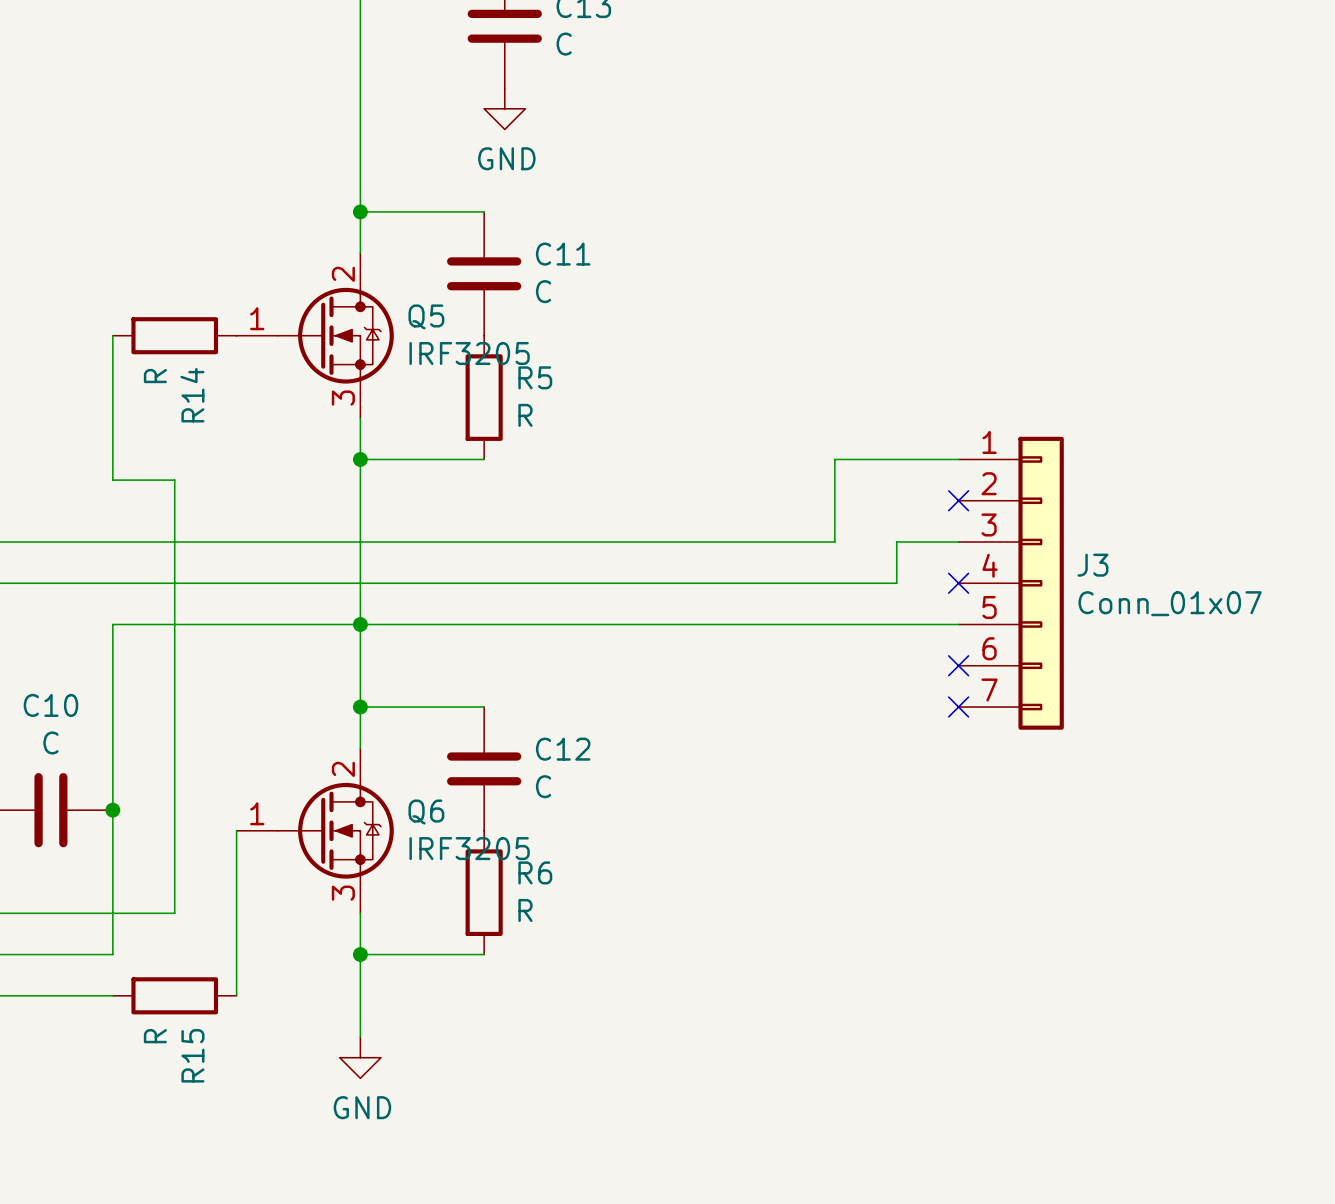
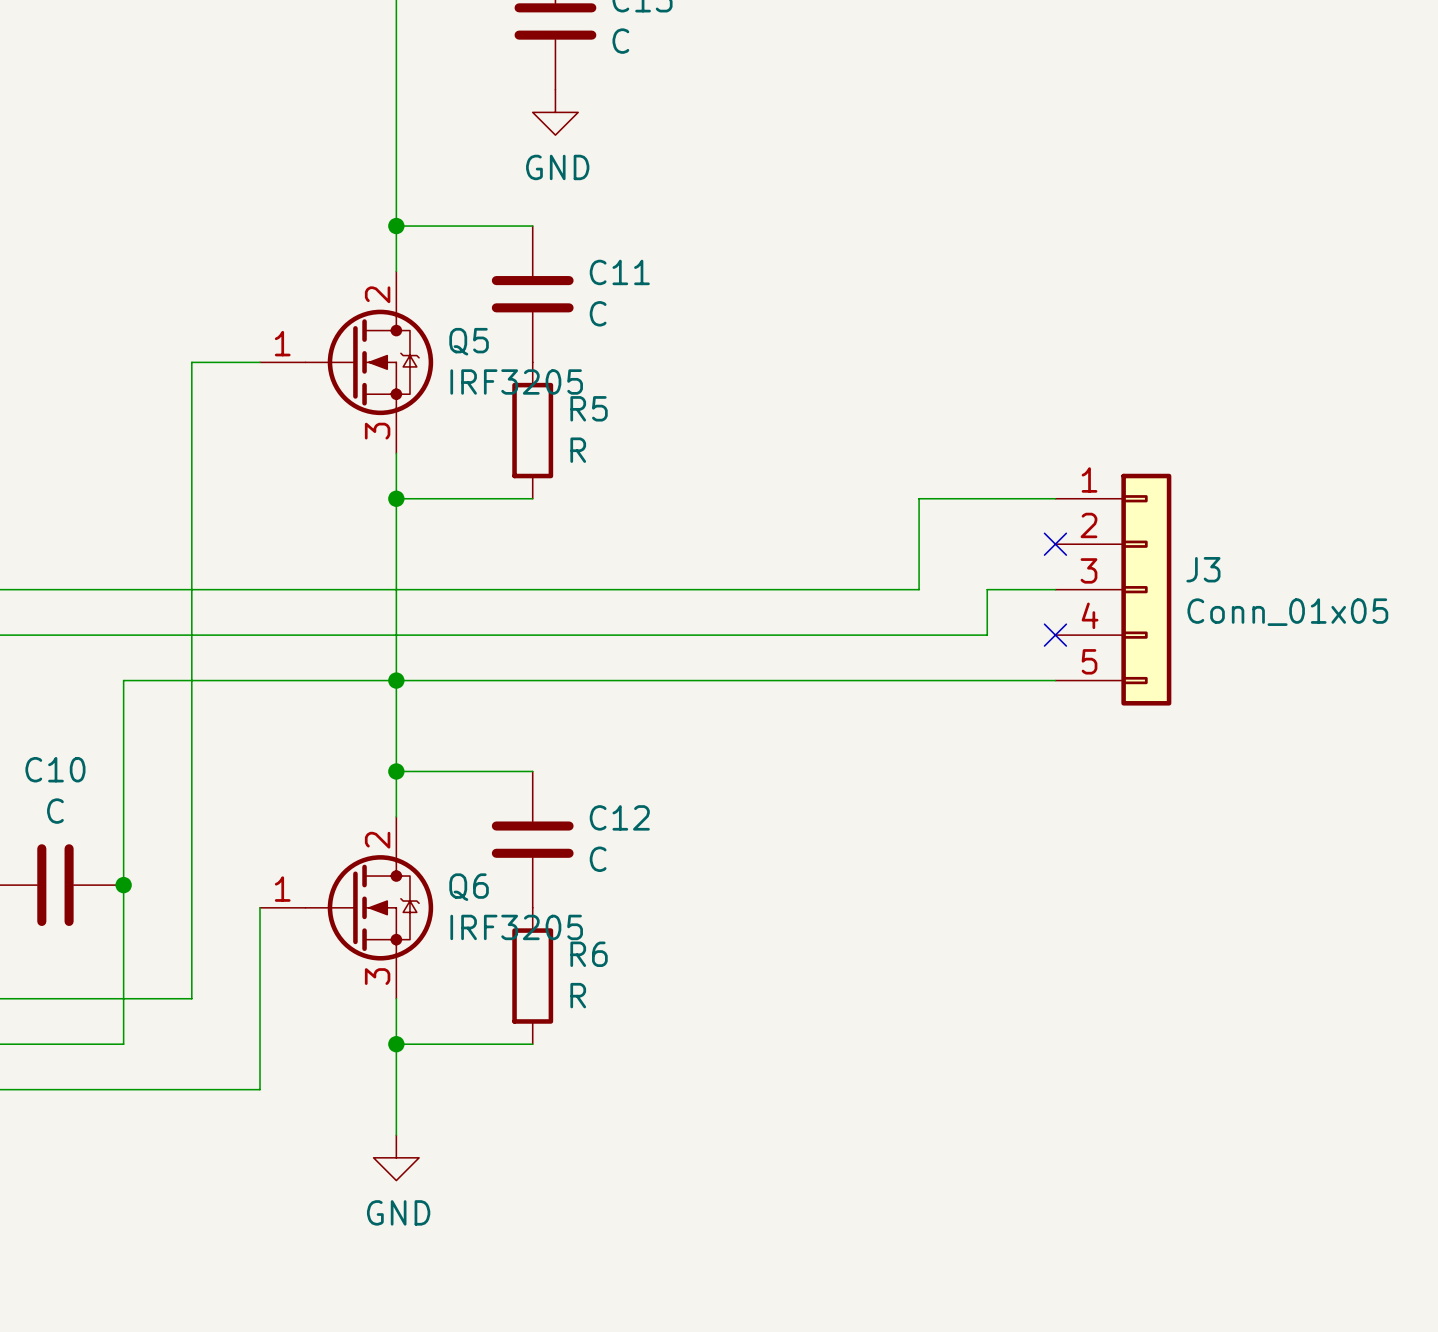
wire: (112, 335) (112, 480) (174, 480) -> (259, 362) (191, 362) (191, 521)
R14: R (174, 335) -> none
J3 symbol: [958, 436, 1064, 730] -> [1055, 473, 1172, 706]
J3 value: Conn_01x07 (1170, 603) -> Conn_01x05 (1287, 612)
no-connect mark: (958, 665) -> none
no-connect mark: (958, 707) -> none
wire: none -> (123, 1089) (259, 1089)
R15: R (174, 995) -> none

